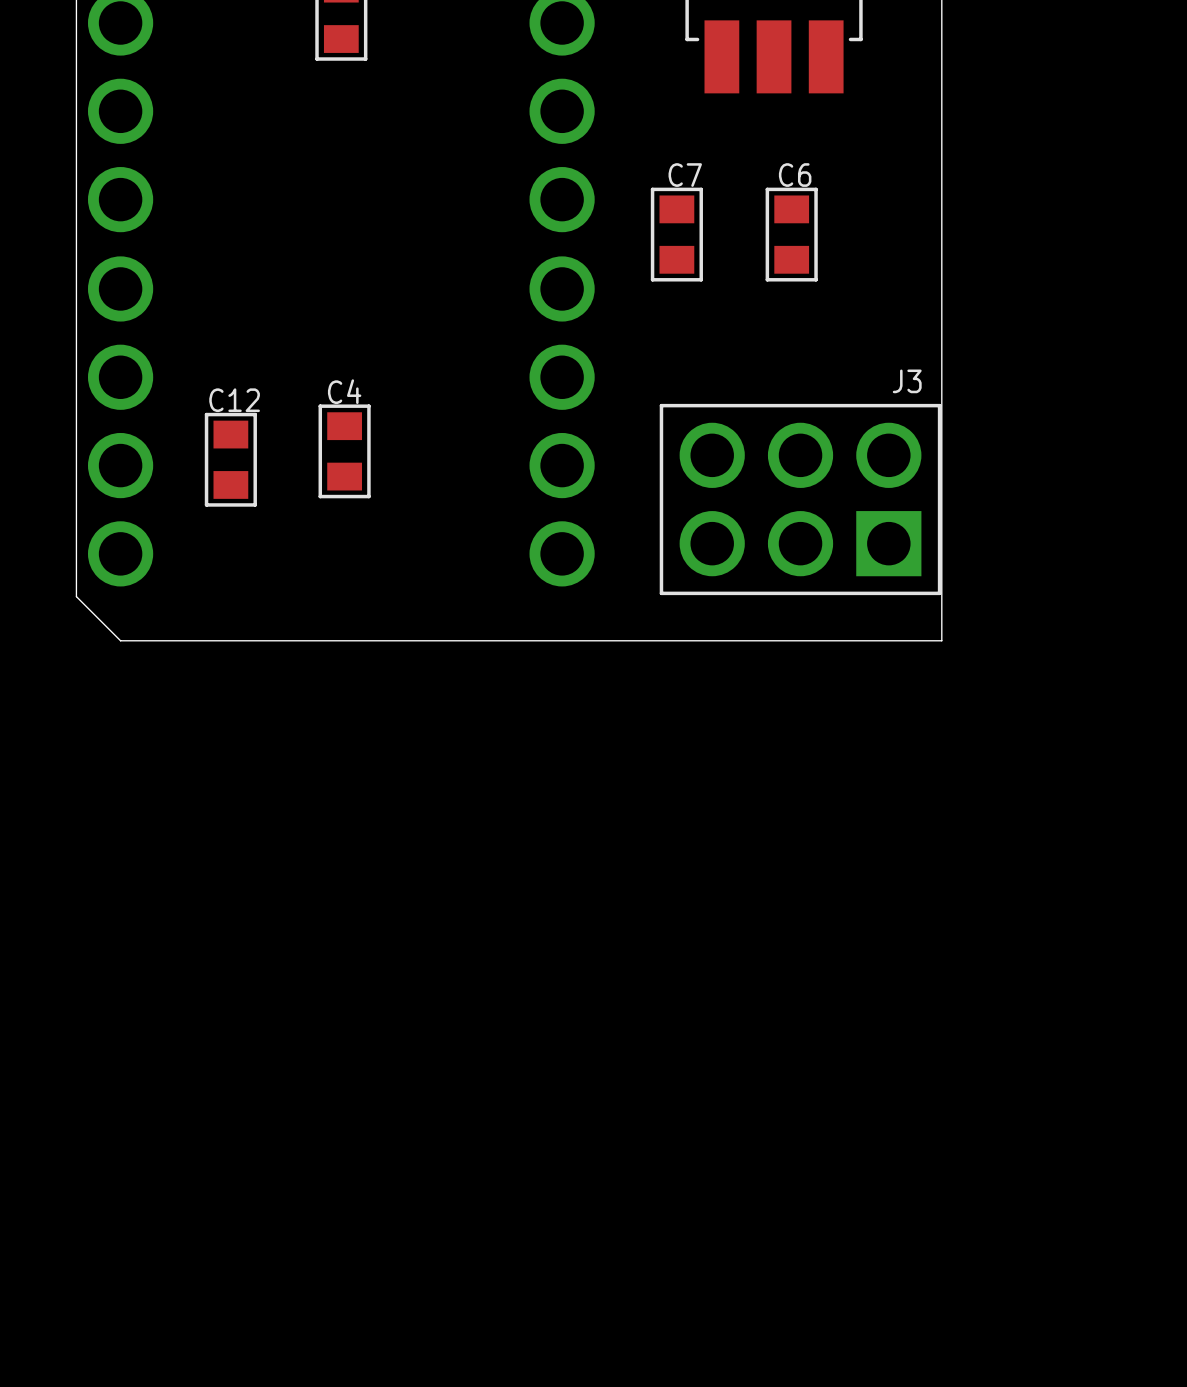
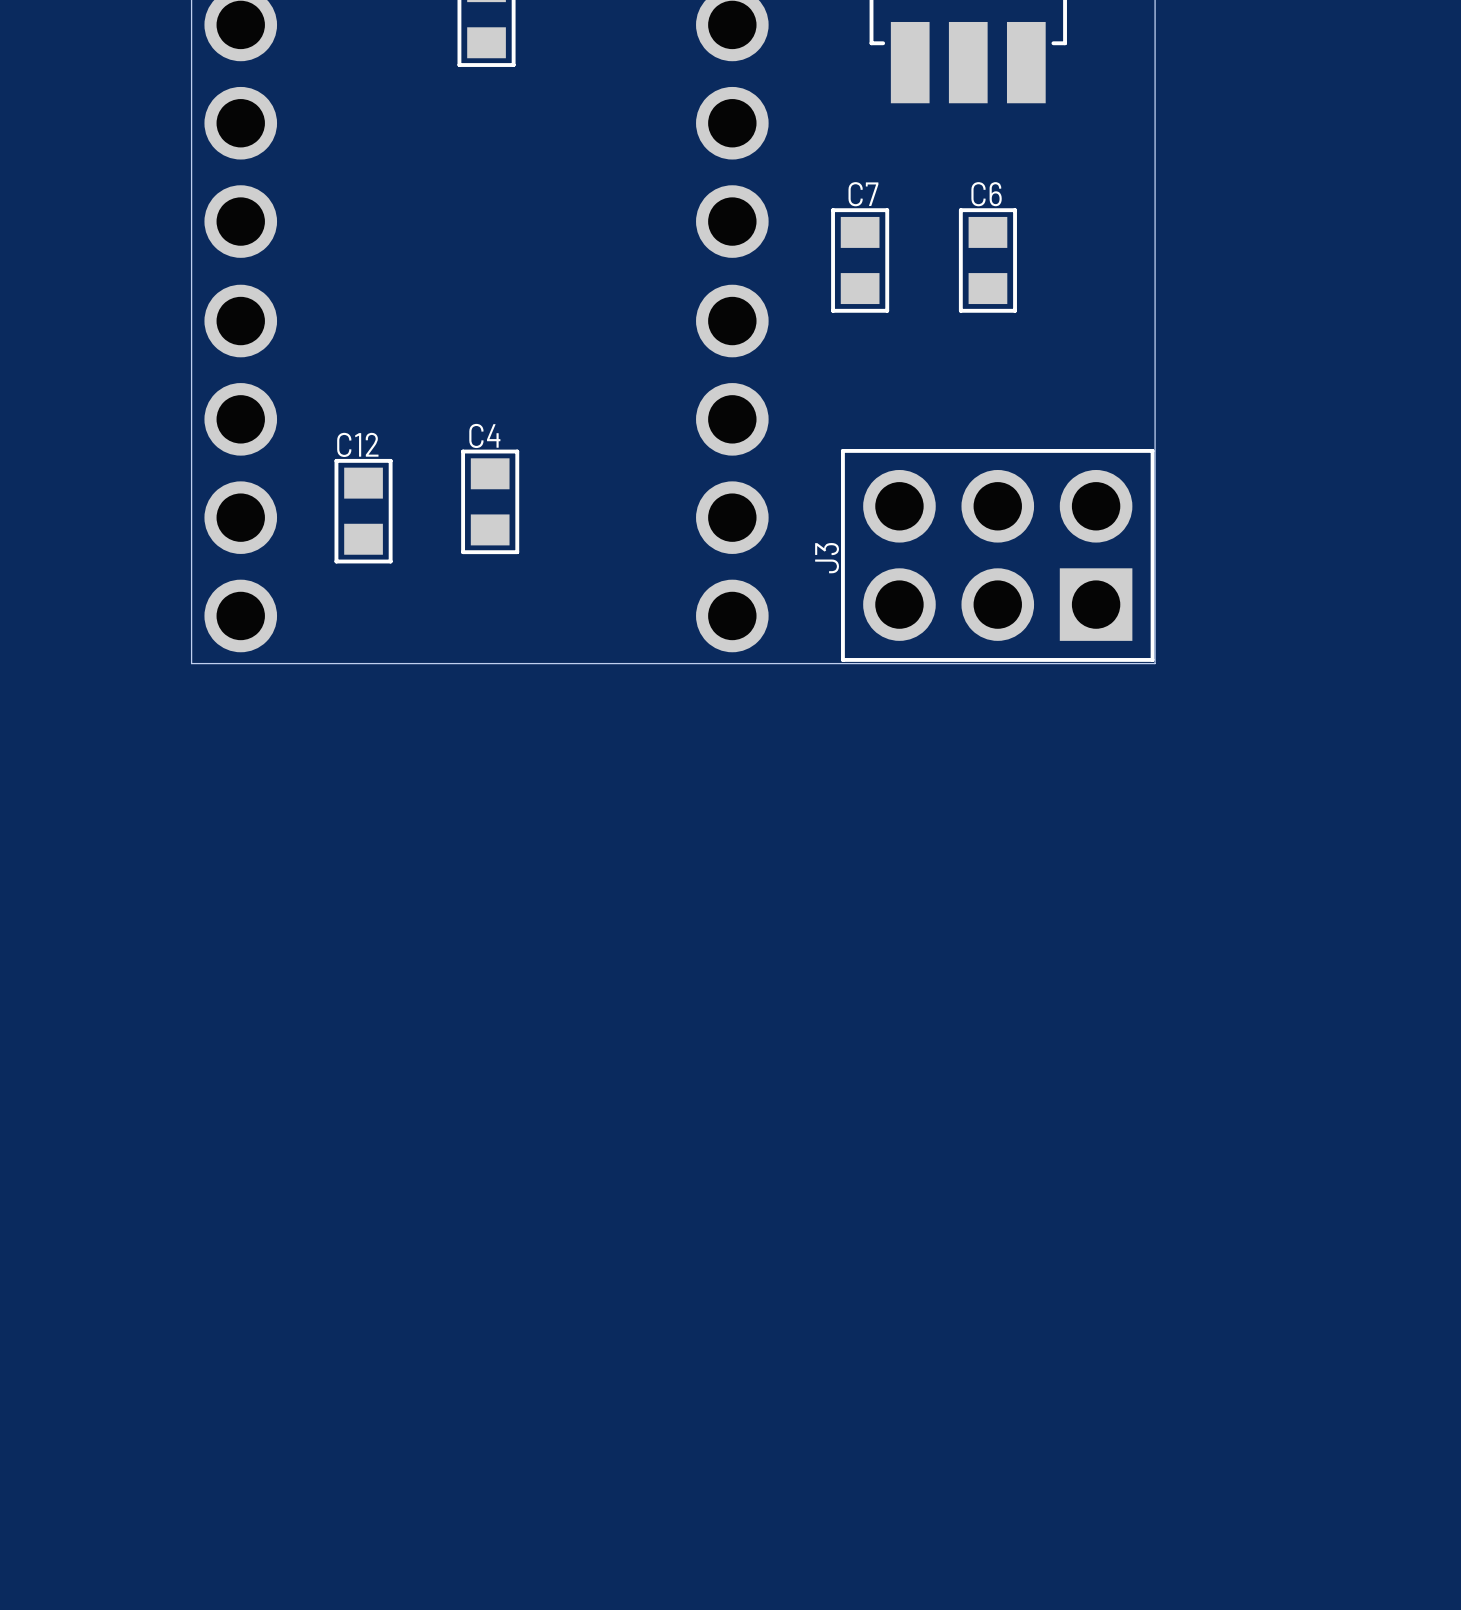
J3 name rotation: 0° (907, 381) -> 90° counterclockwise (827, 558)
J3 name position: J3 (907, 381) -> J3 (827, 558)
board edge: (76, 596) (120, 640) (941, 640) (941, 596) -> (191, 663) (1155, 663)

